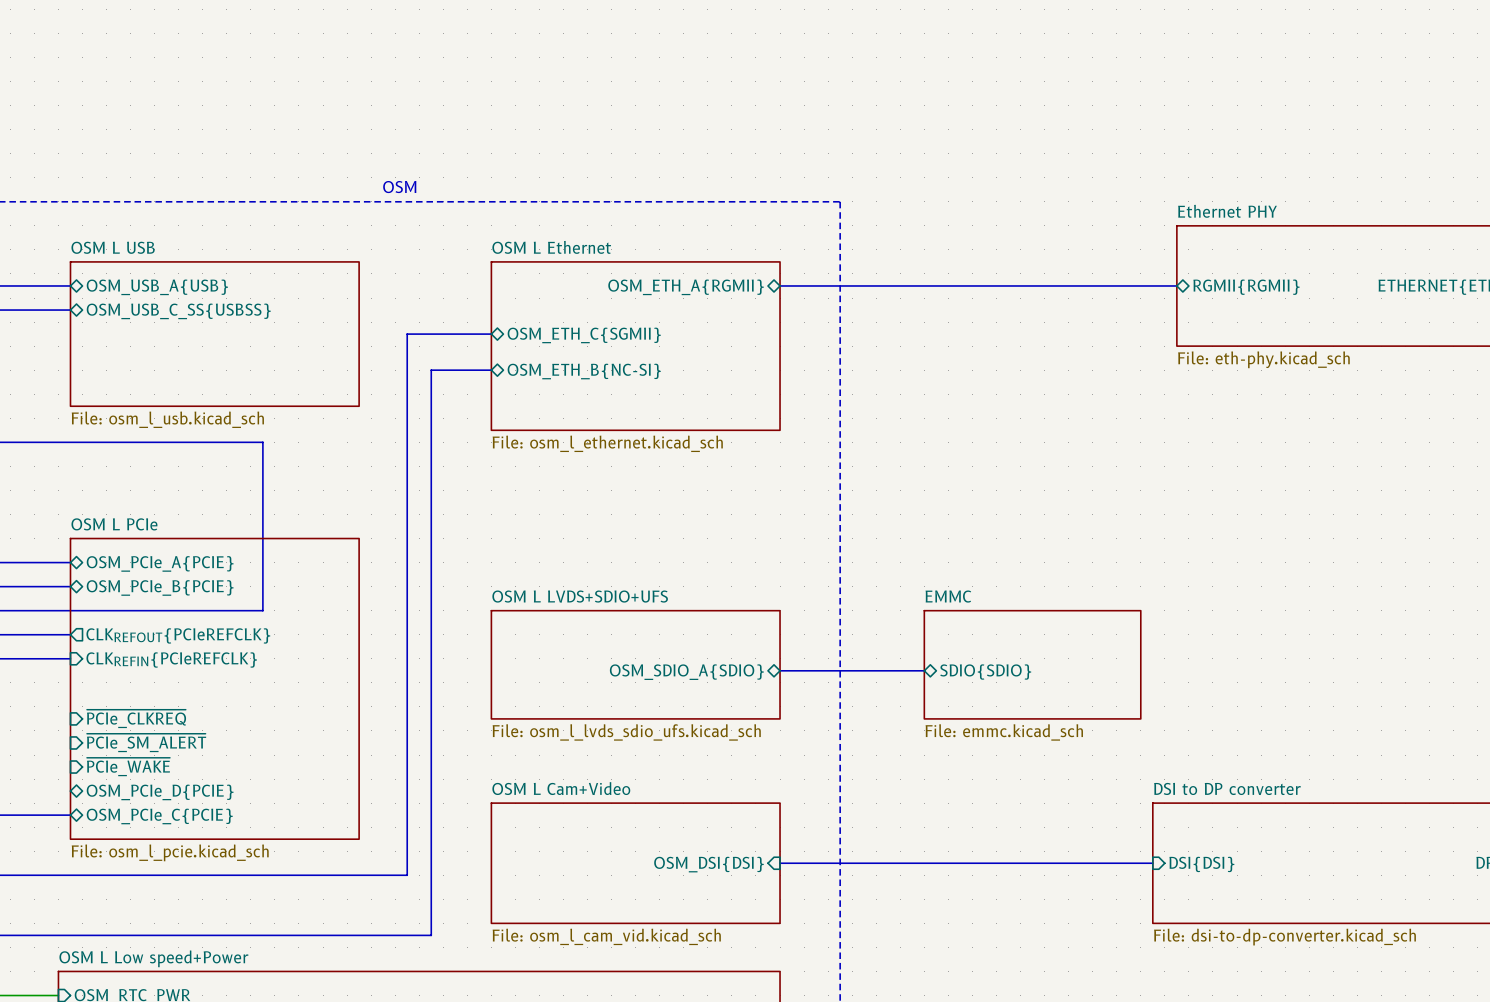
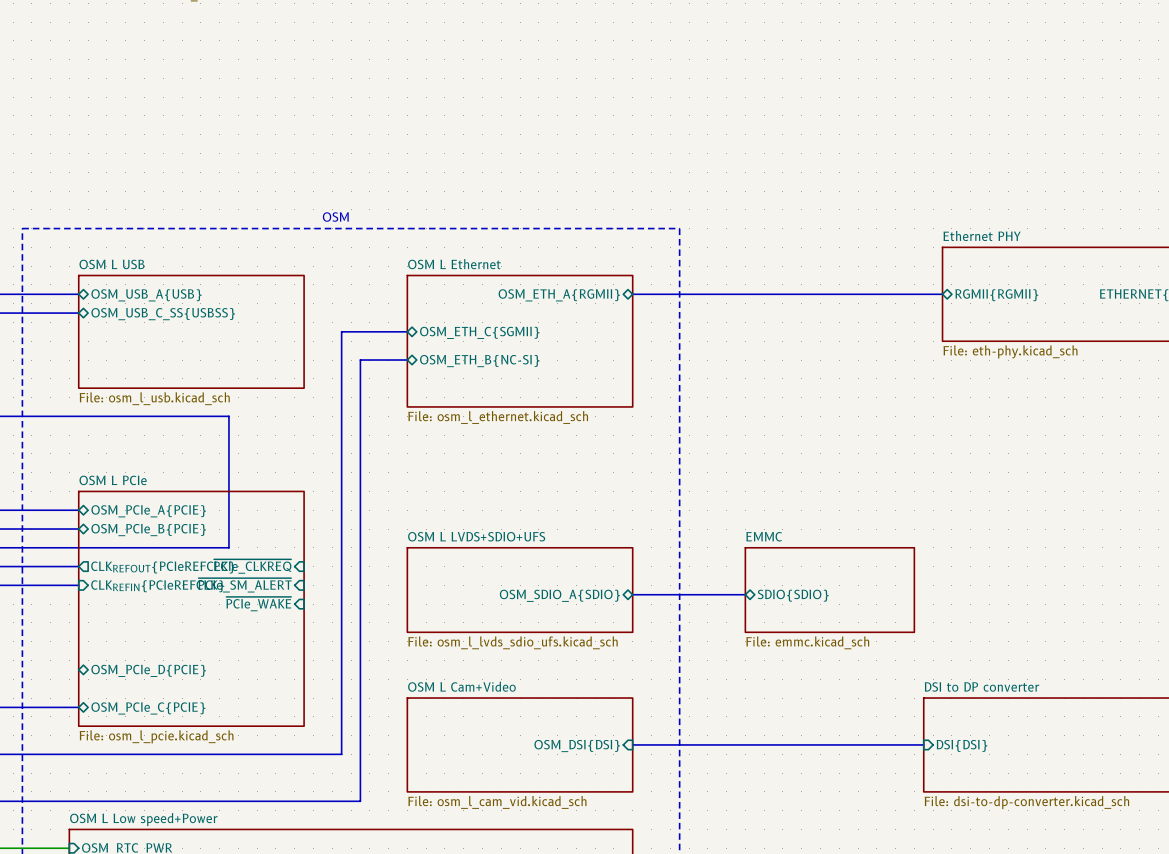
sheet pin: none -> ~{PCIe_CLKREQ} (252, 566)
sheet pin: none -> ~{PCIe_SM_ALERT} (245, 585)
sheet pin: none -> ~{PCIe_WAKE} (258, 604)
sheet pin: ~{PCIe_CLKREQ} (136, 718) -> none
sheet pin: ~{PCIe_SM_ALERT} (146, 742) -> none
sheet pin shape: input (128, 766) -> bidirectional (148, 670)
sheet pin: ~{PCIe_WAKE} (128, 766) -> OSM_PCIe_D{PCIE} (148, 670)
sheet pin: OSM_PCIe_D{PCIE} (160, 792) -> none

